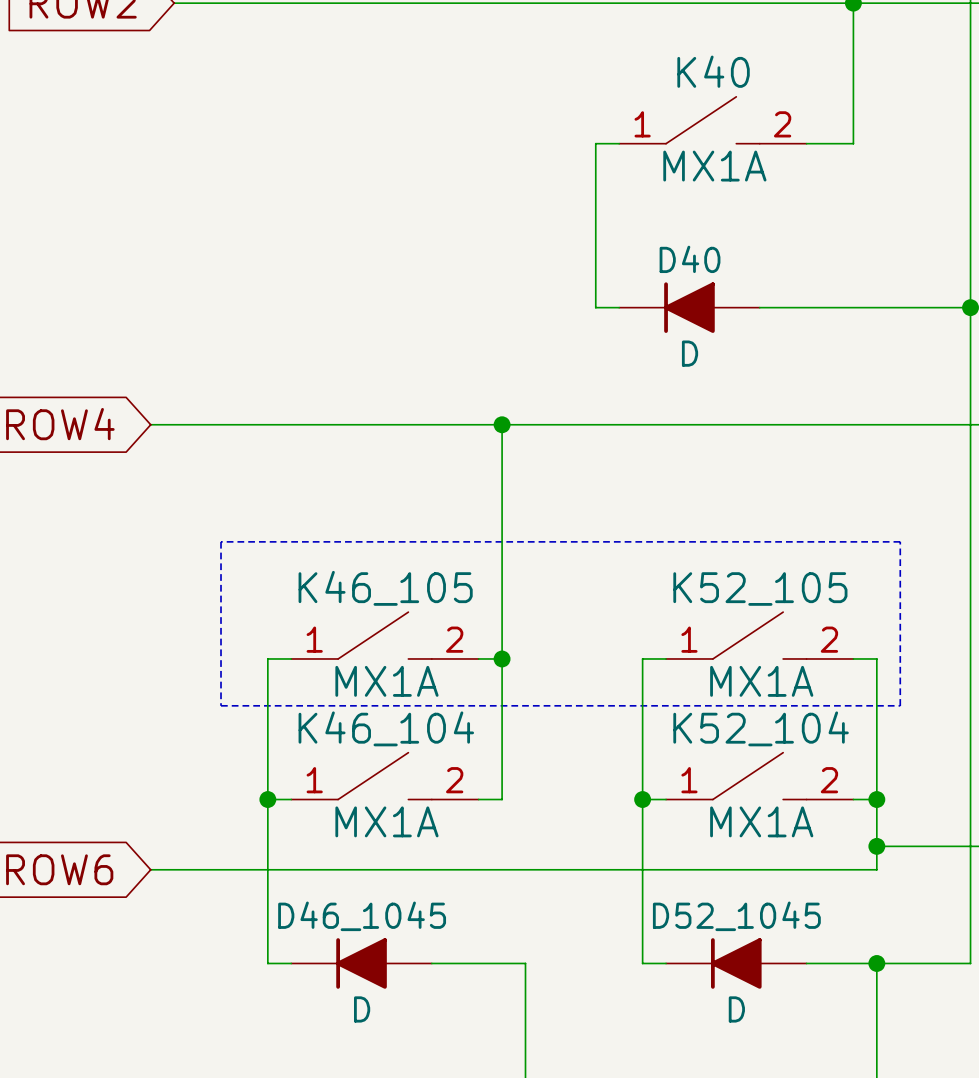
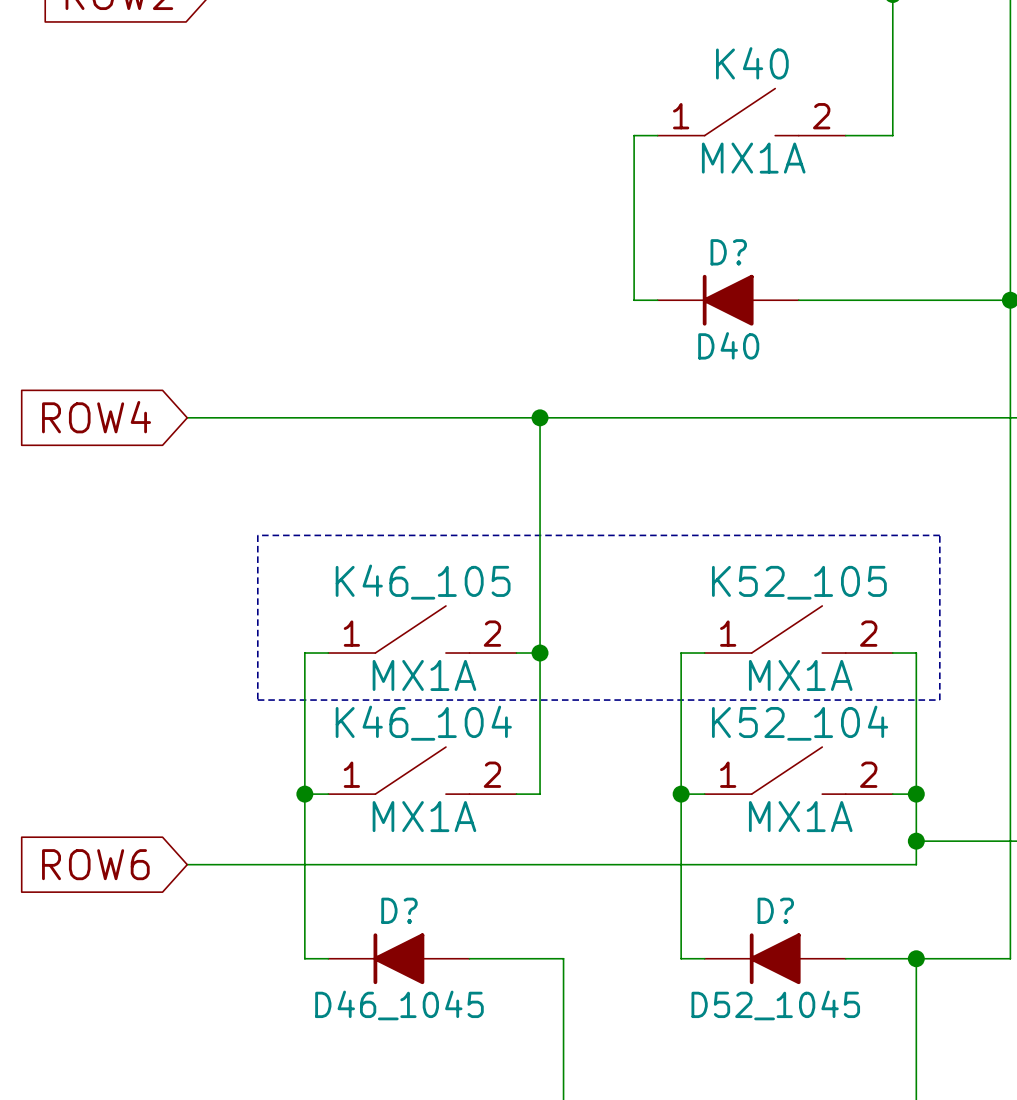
D40 name: D40 (690, 259) -> D? (728, 252)
D40 value: D (690, 353) -> D40 (728, 345)
D46_1045 name: D46_1045 (362, 916) -> D? (399, 910)
D52_1045 name: D52_1045 (736, 916) -> D? (775, 910)
D46_1045 value: D (362, 1009) -> D46_1045 (399, 1005)
D52_1045 value: D (736, 1009) -> D52_1045 (775, 1005)

